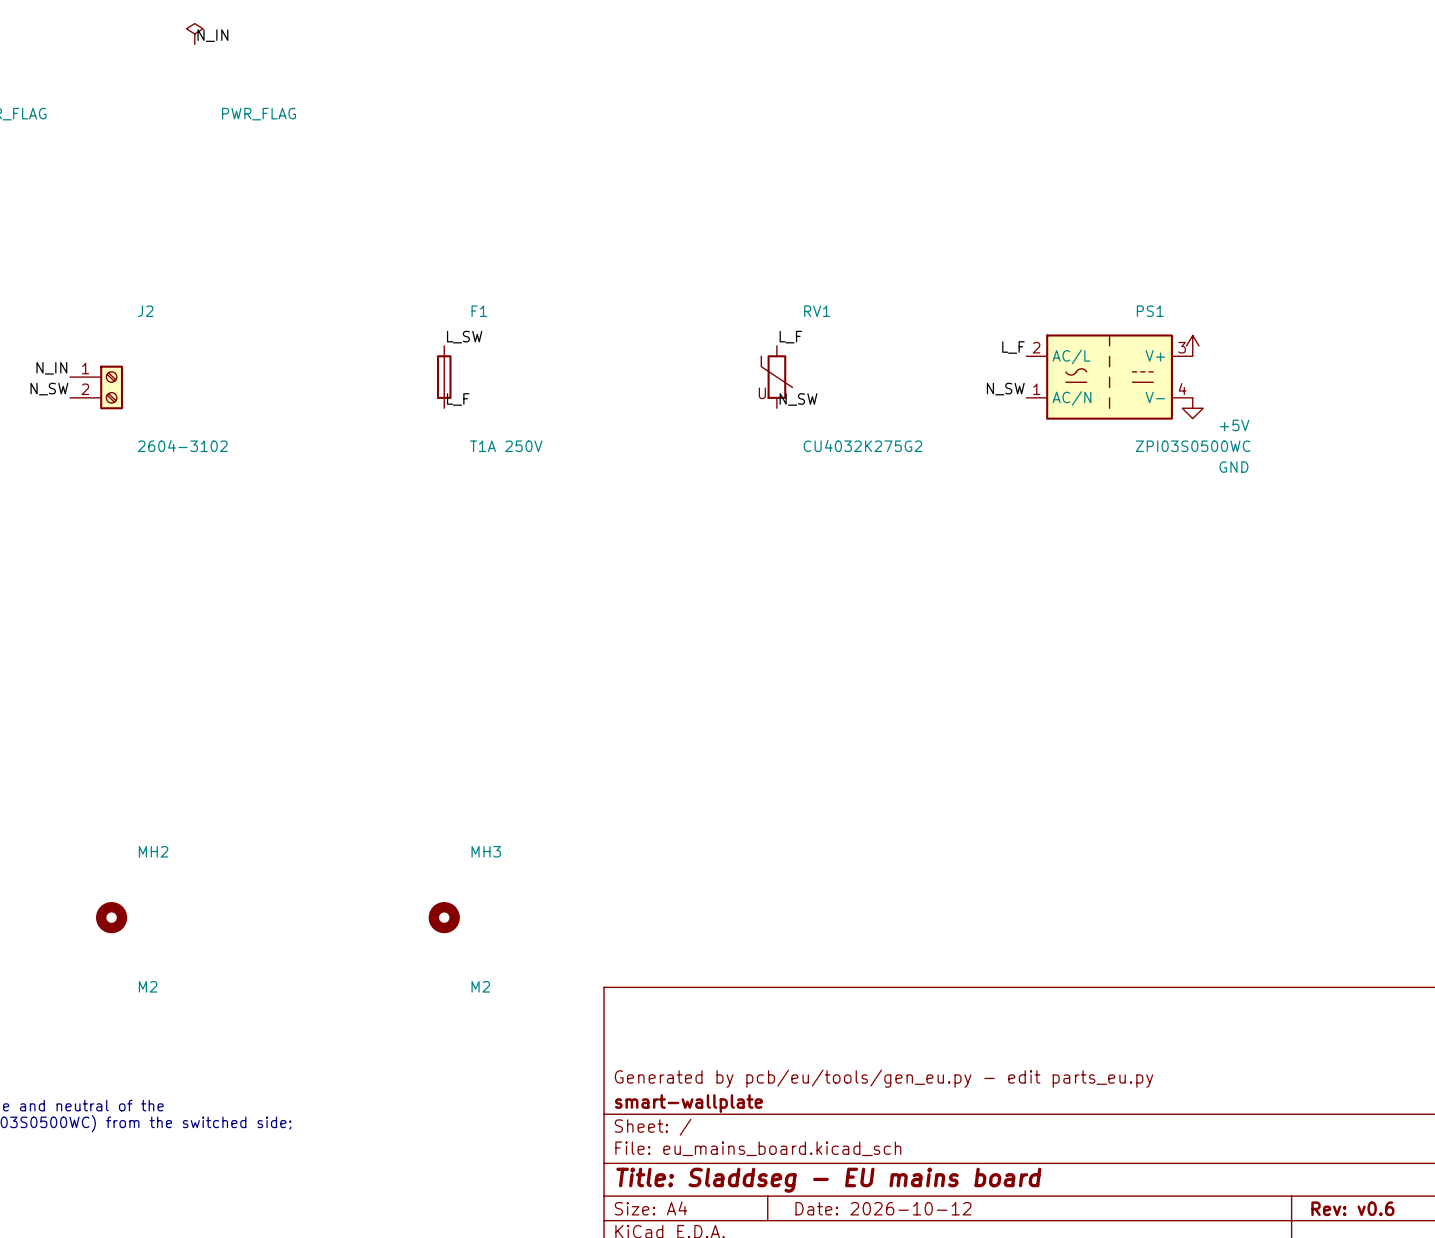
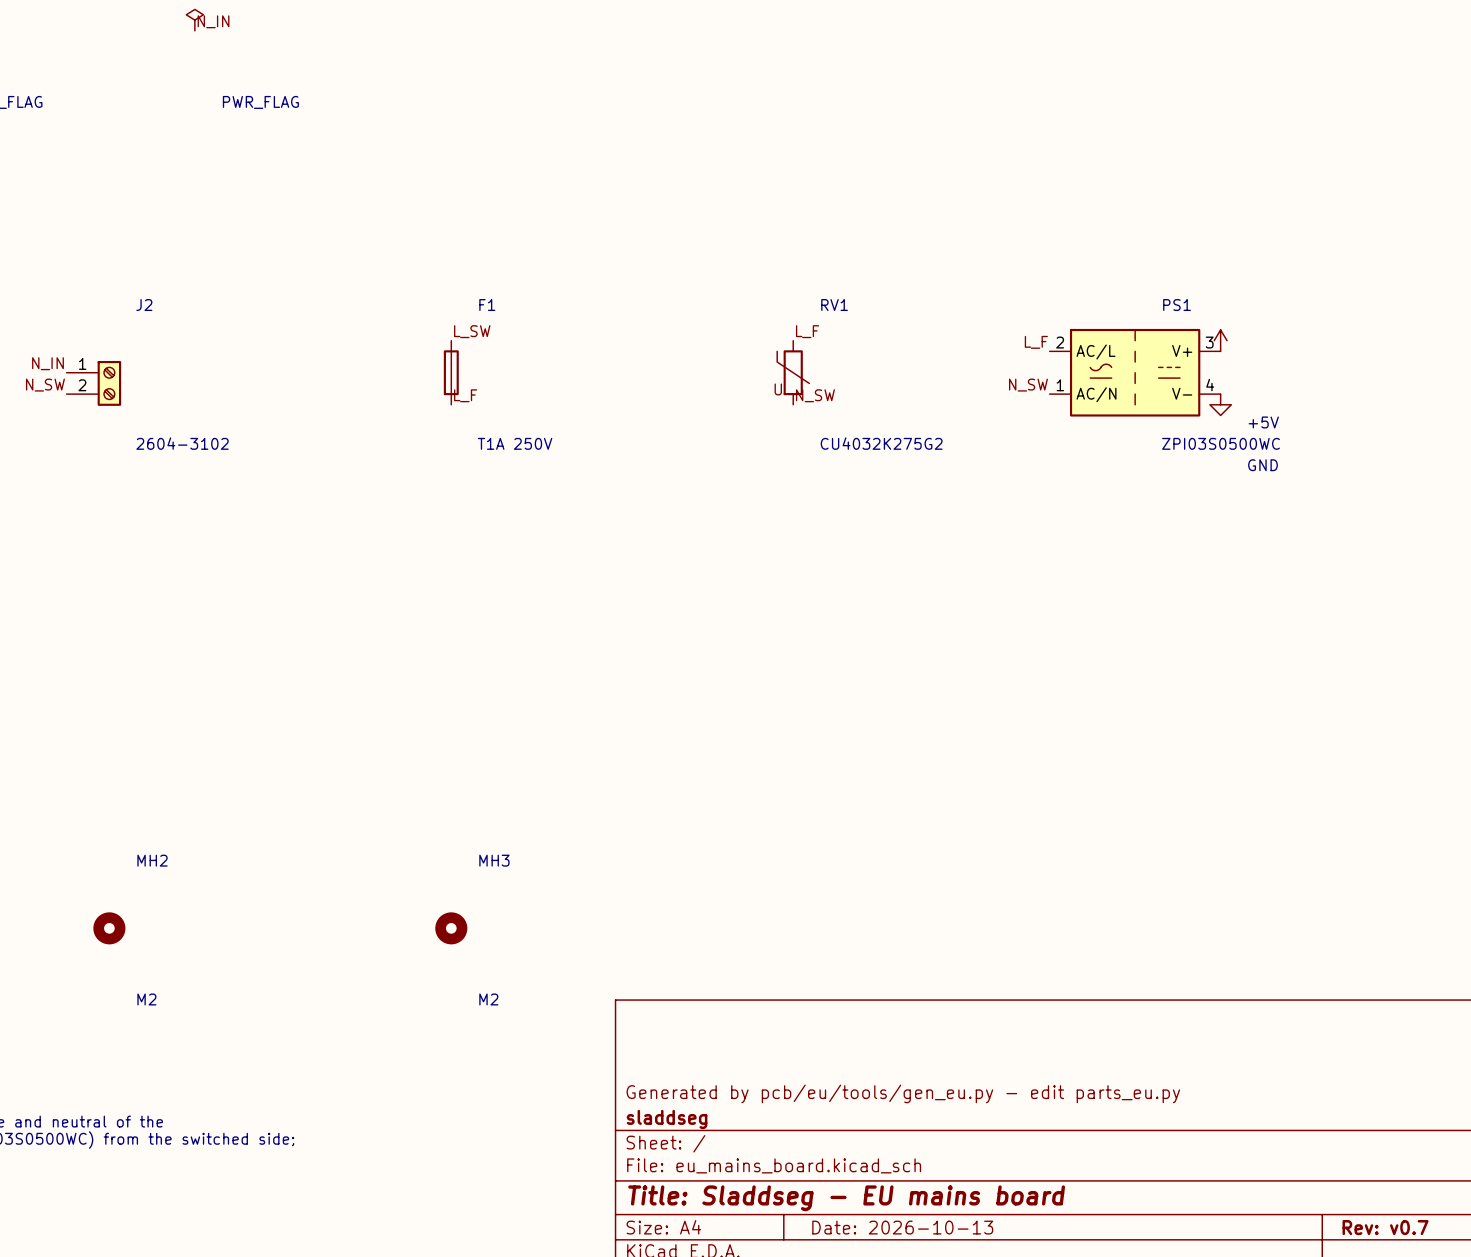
title block: smart-wallplate (688, 1103) -> sladdseg (667, 1119)
title block: Date: 2026-10-12 (883, 1208) -> Date: 2026-10-13 (902, 1227)
title block: Rev: v0.6 (1352, 1208) -> Rev: v0.7 (1385, 1227)

